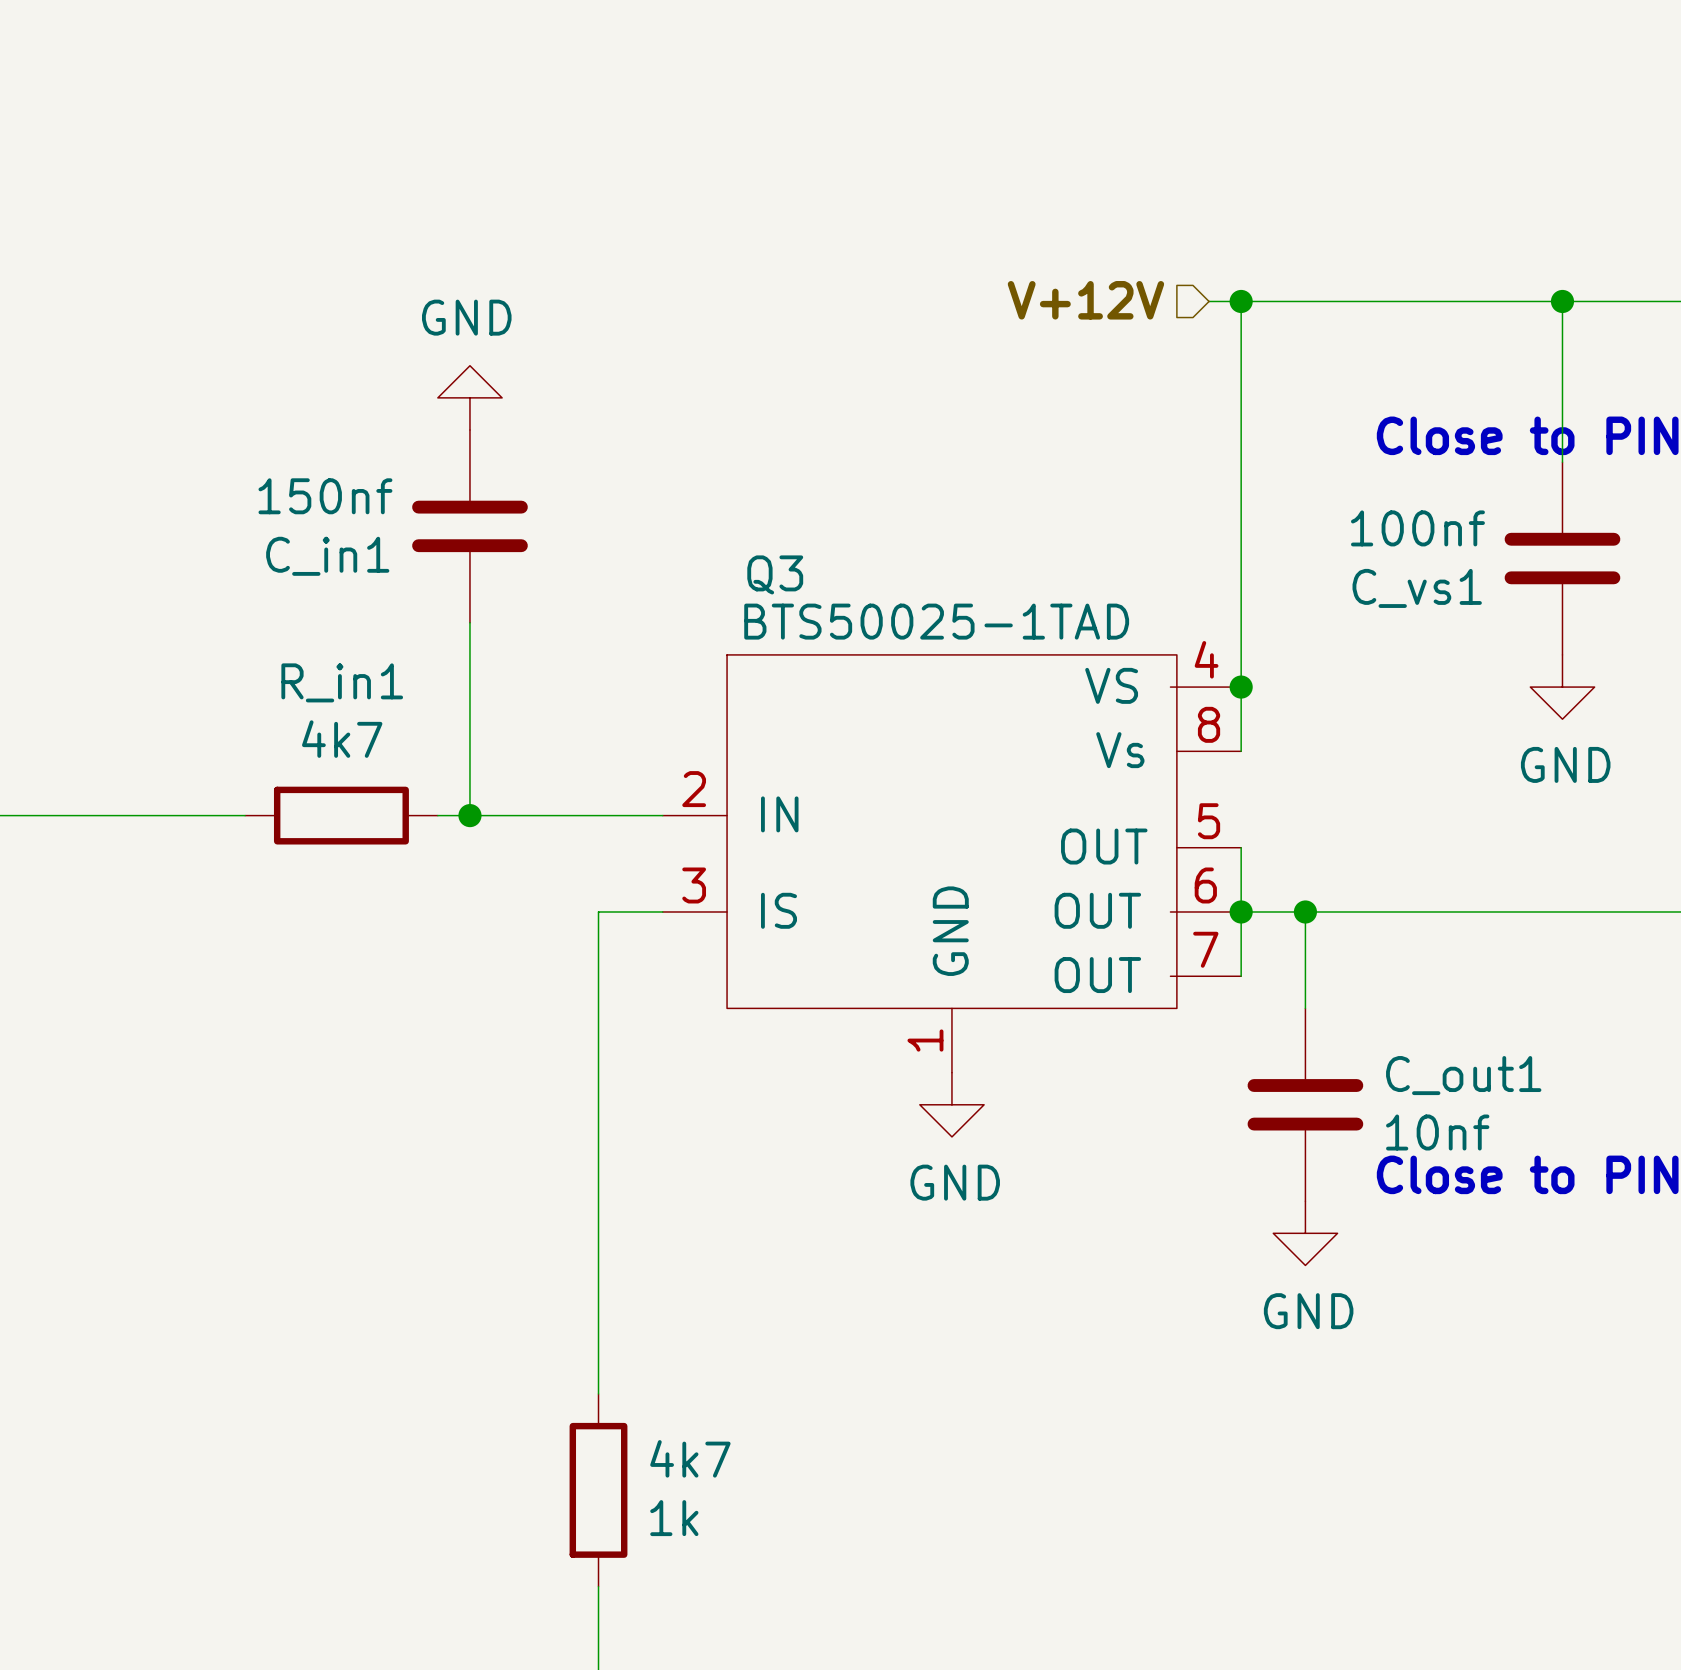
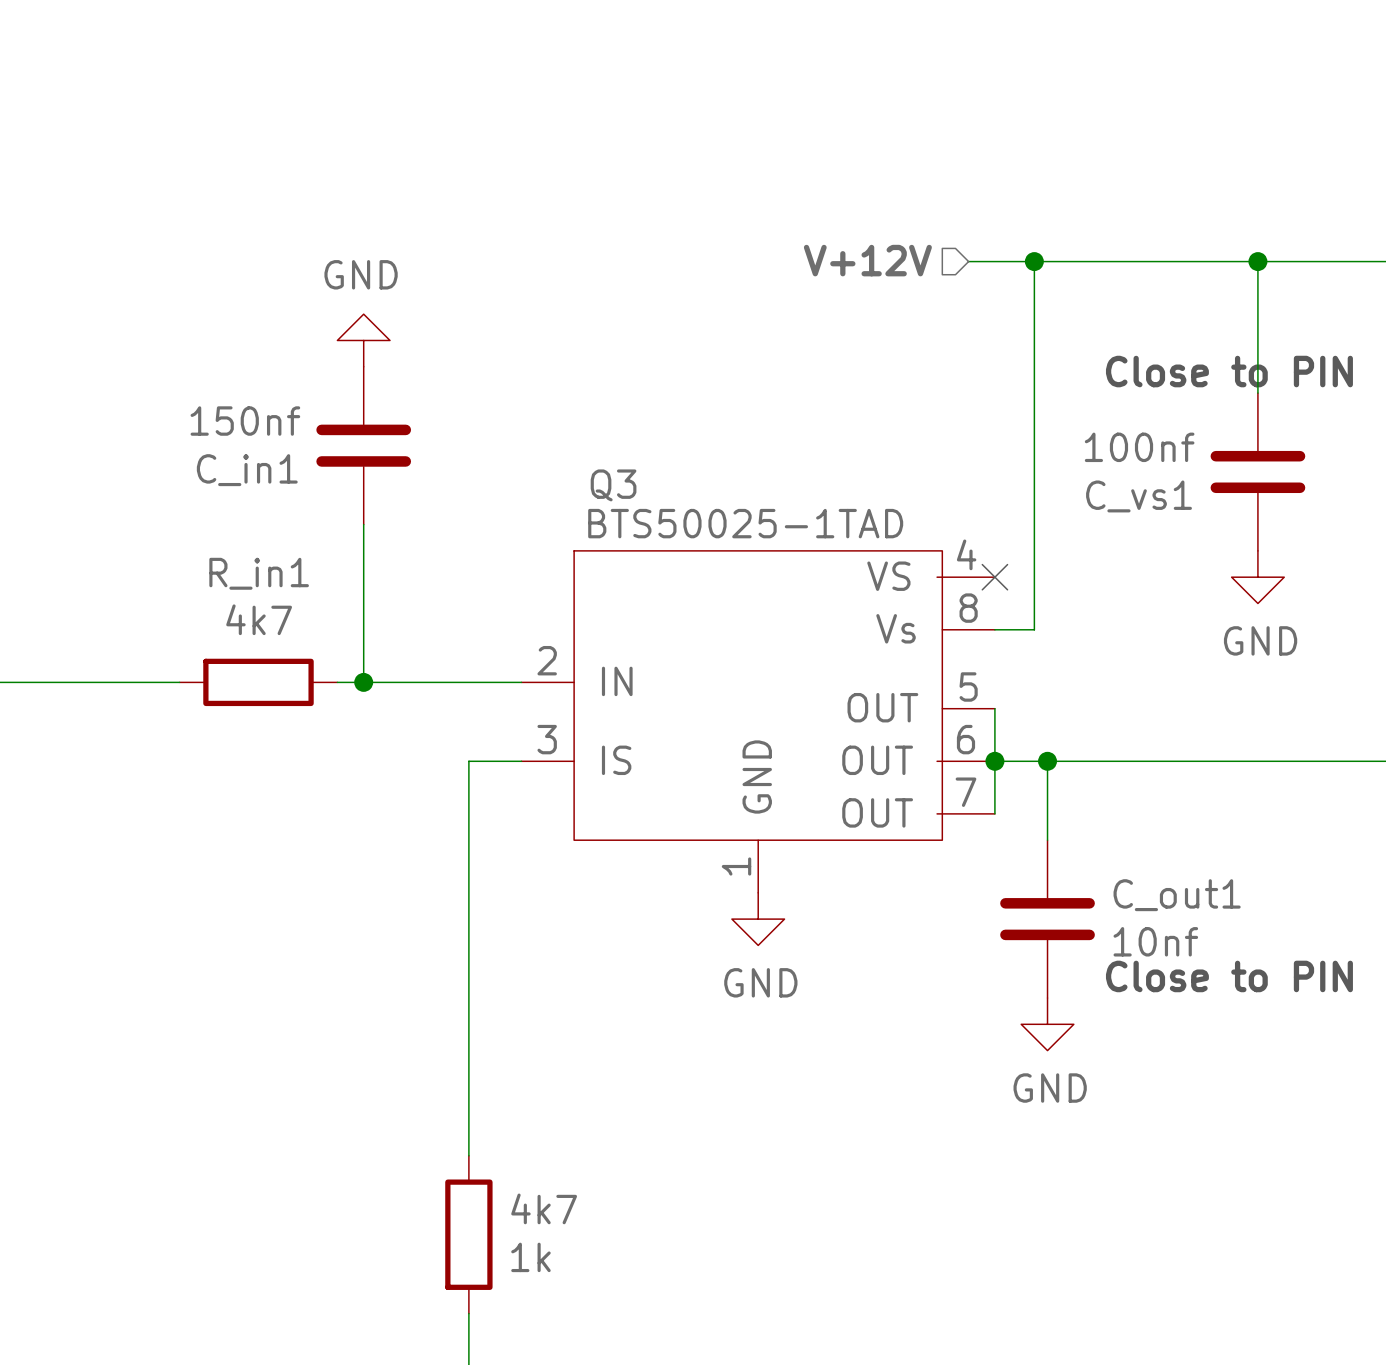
wire: (1241, 301) (1241, 751) -> (1034, 261) (1034, 629) (994, 629)
junction position: (1241, 301) -> (1034, 261)
junction: (1241, 687) -> none
no-connect mark: none -> (994, 577)

